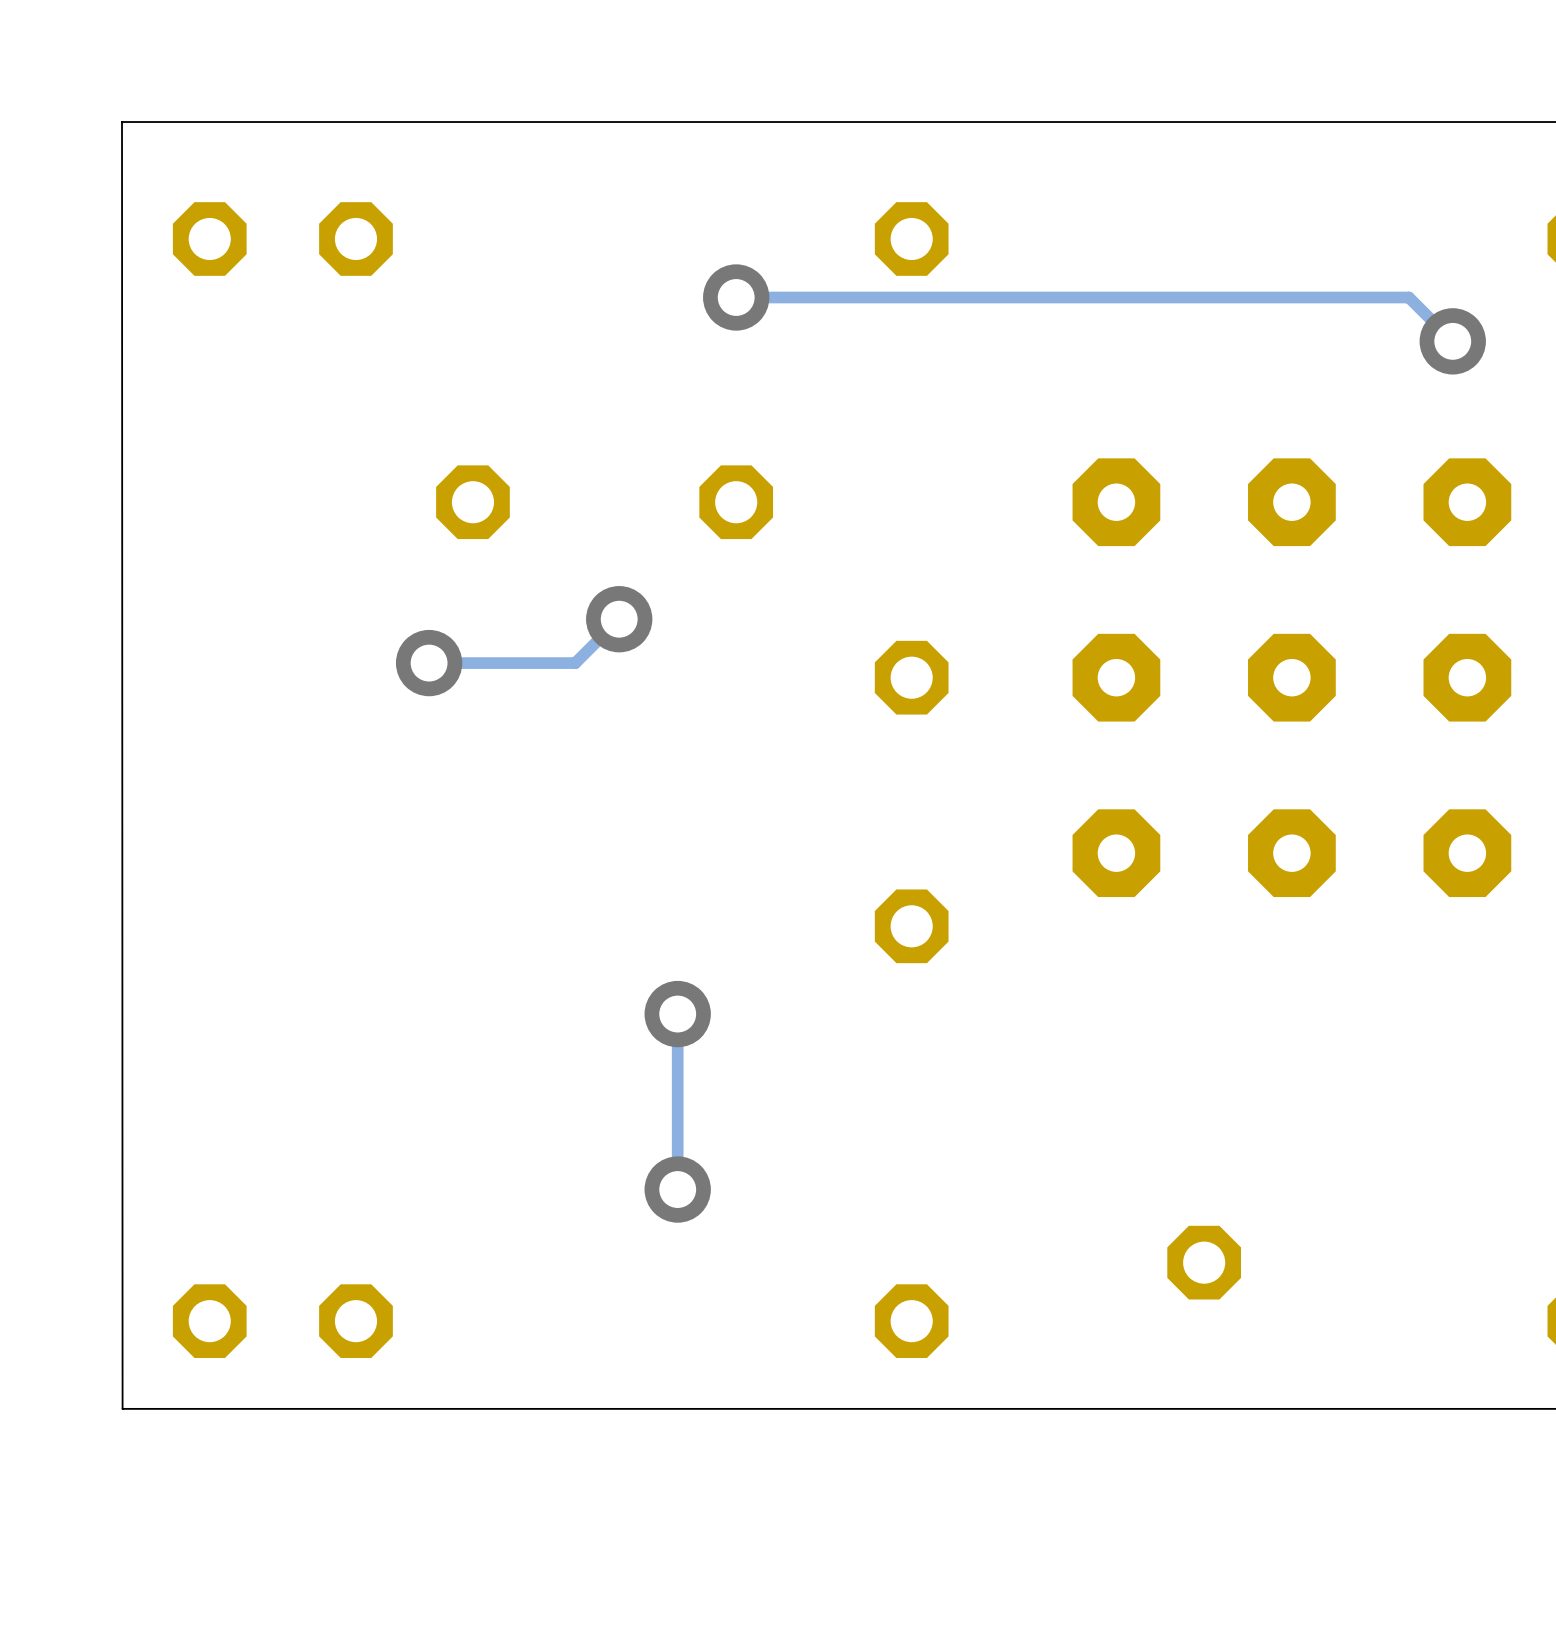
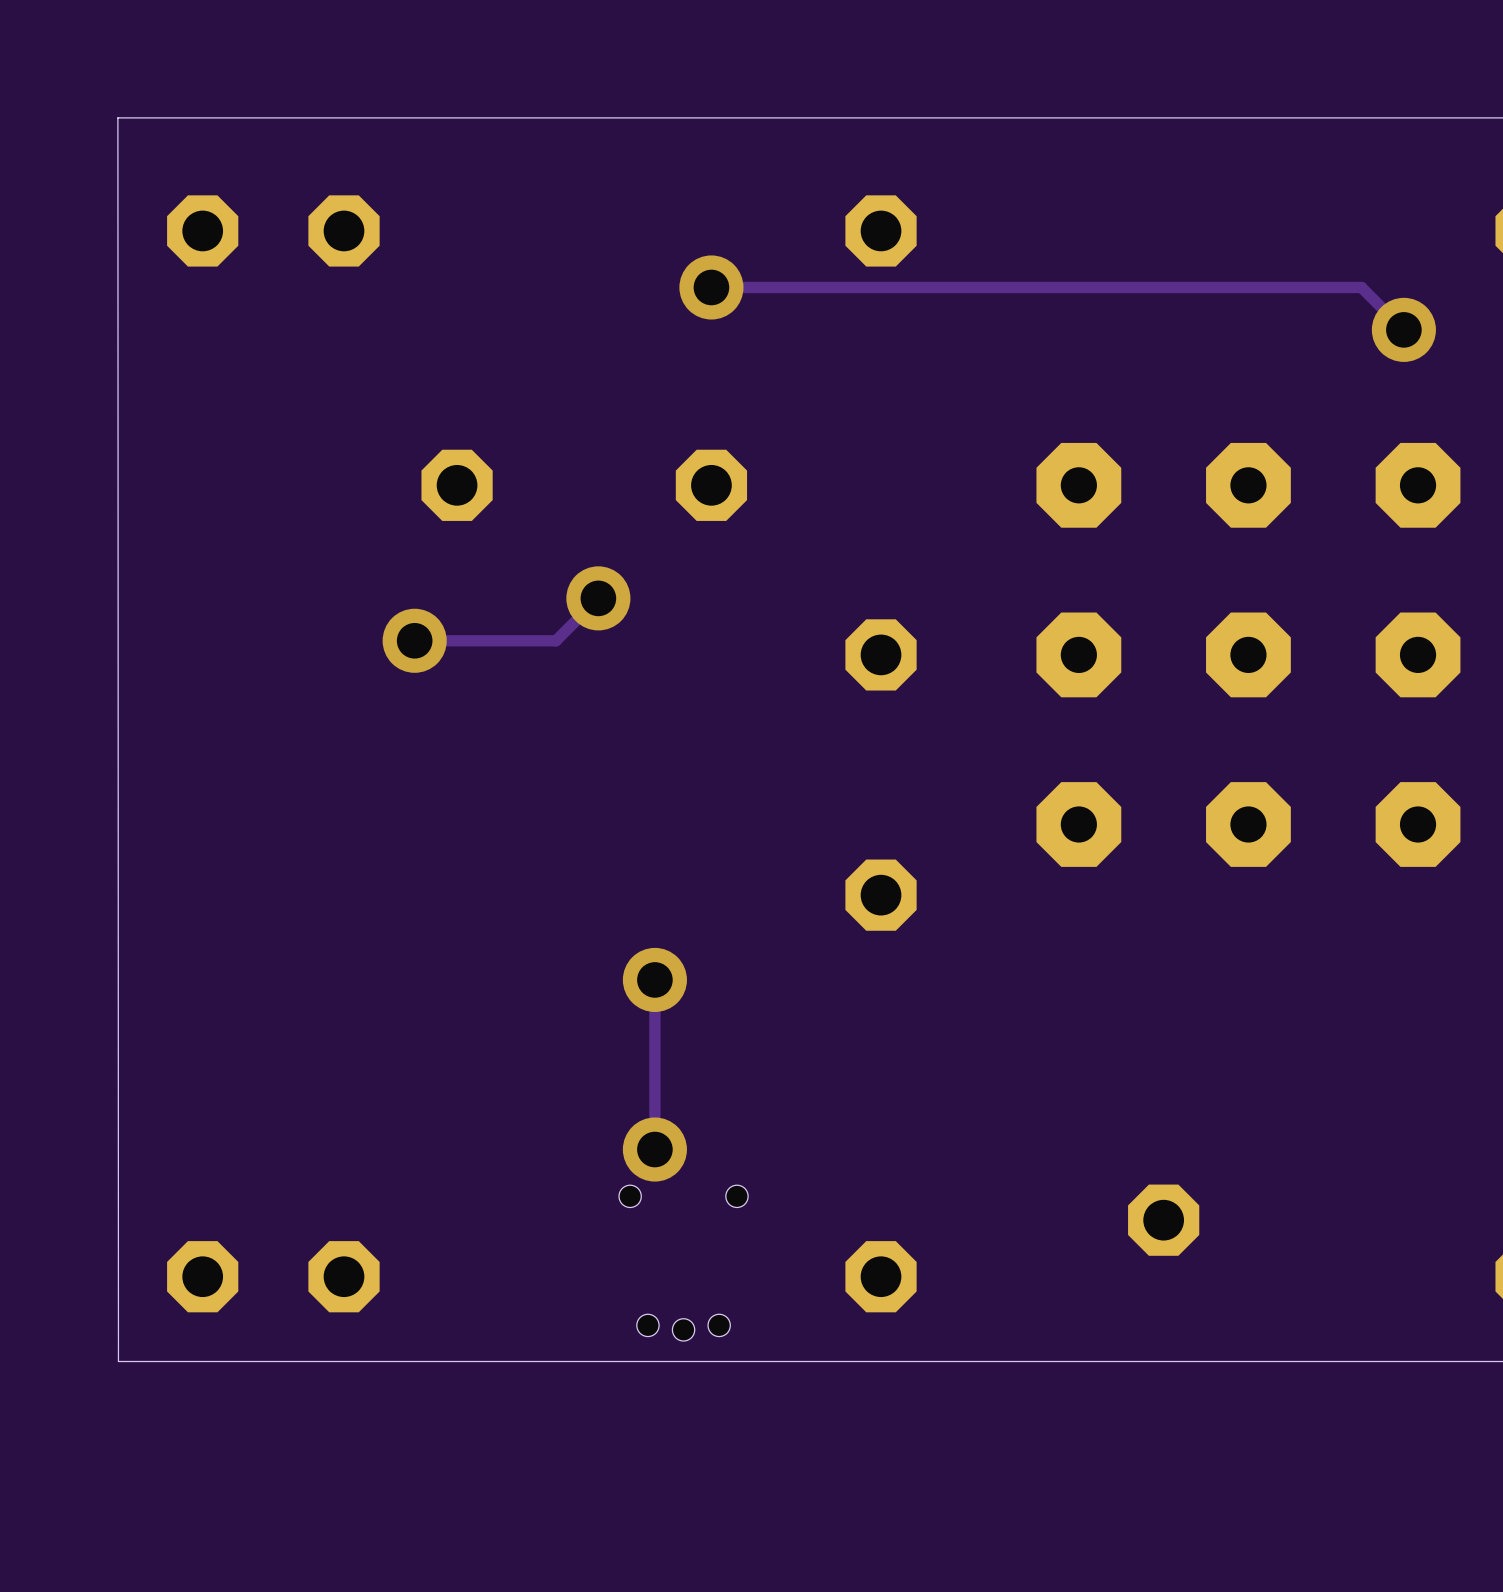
part: none -> (683, 1263)

